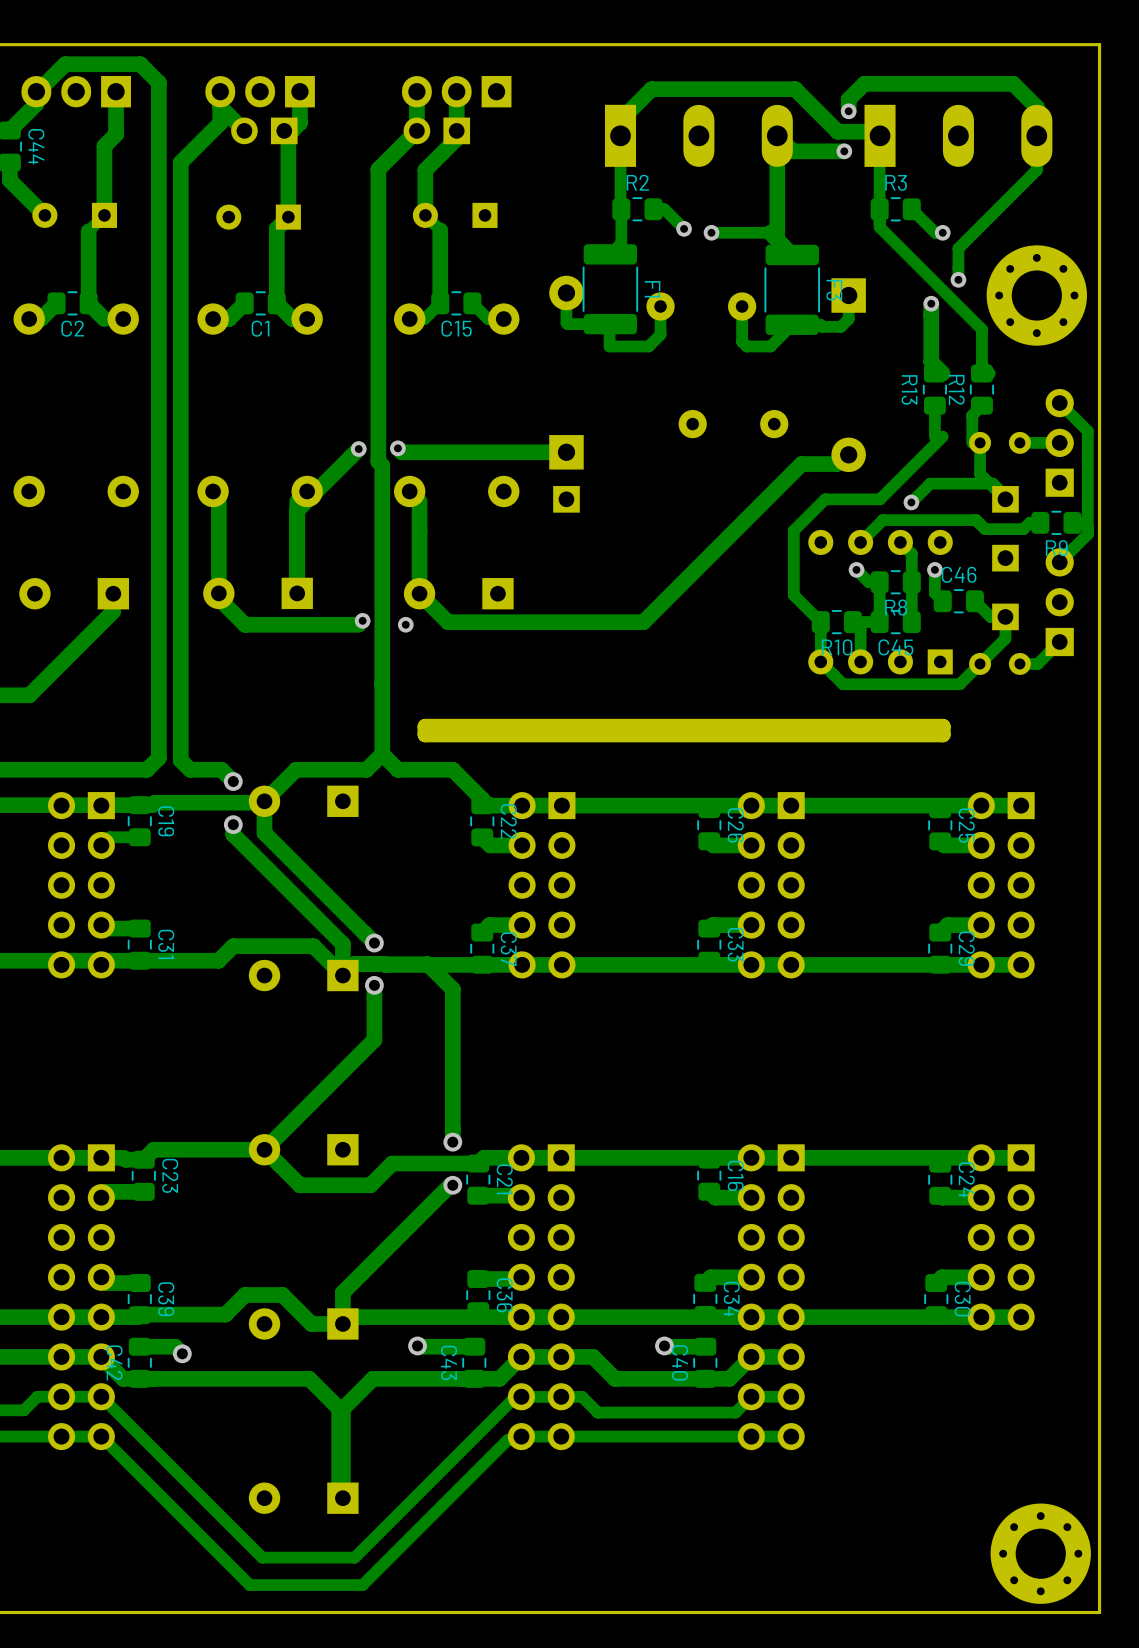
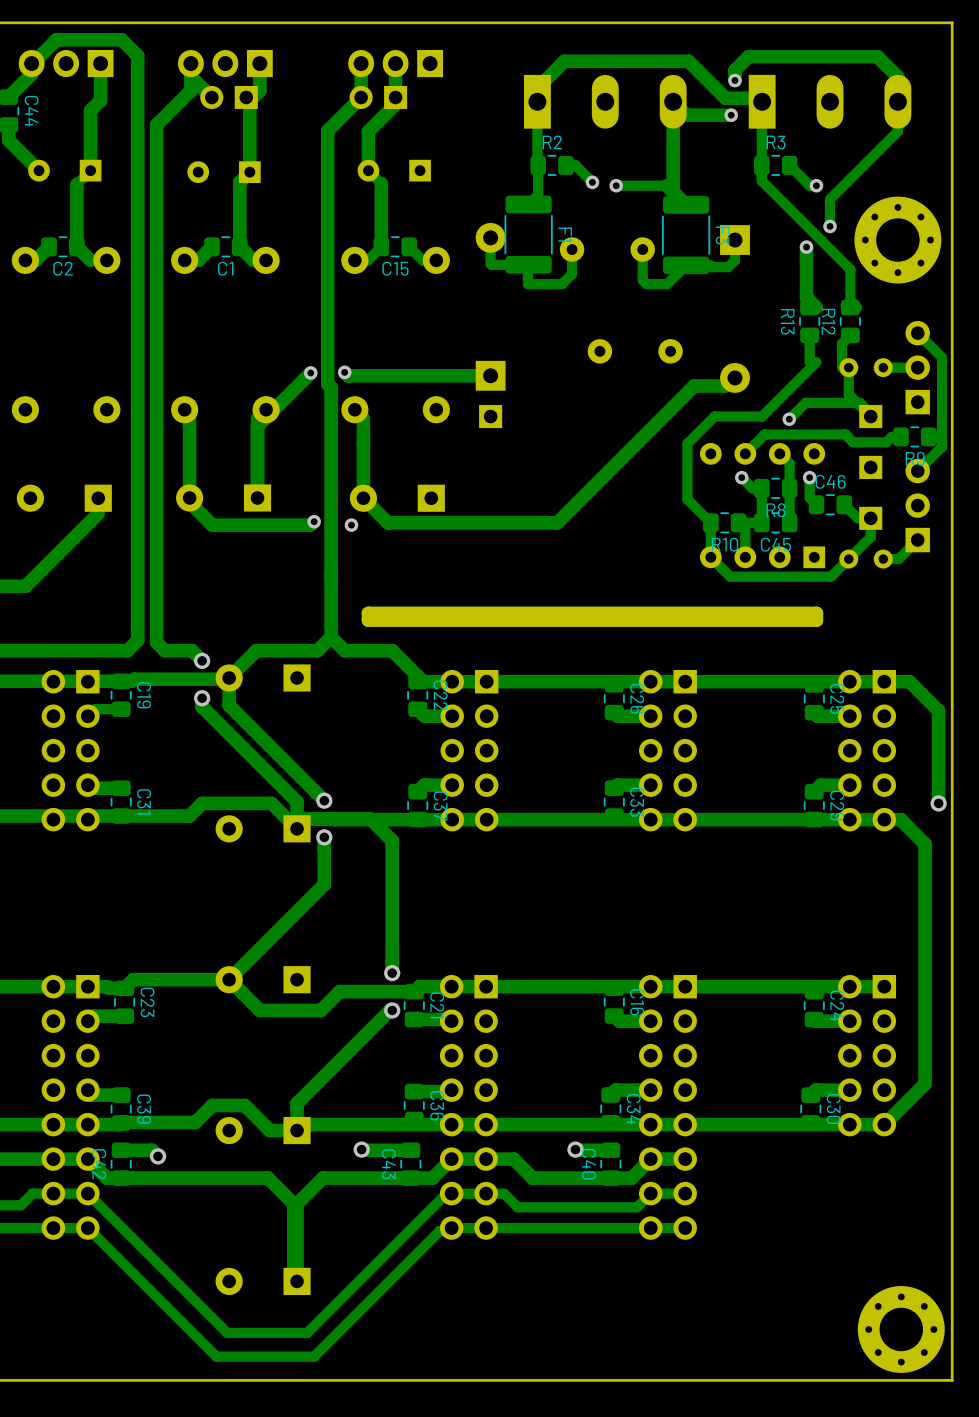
track: (1021, 805) (482, 805) -> (938, 803) (938, 710) (909, 681) (418, 681)
via: none -> (938, 803)
track: none -> (884, 819) (900, 819) (925, 844) (925, 1083) (884, 1124)

